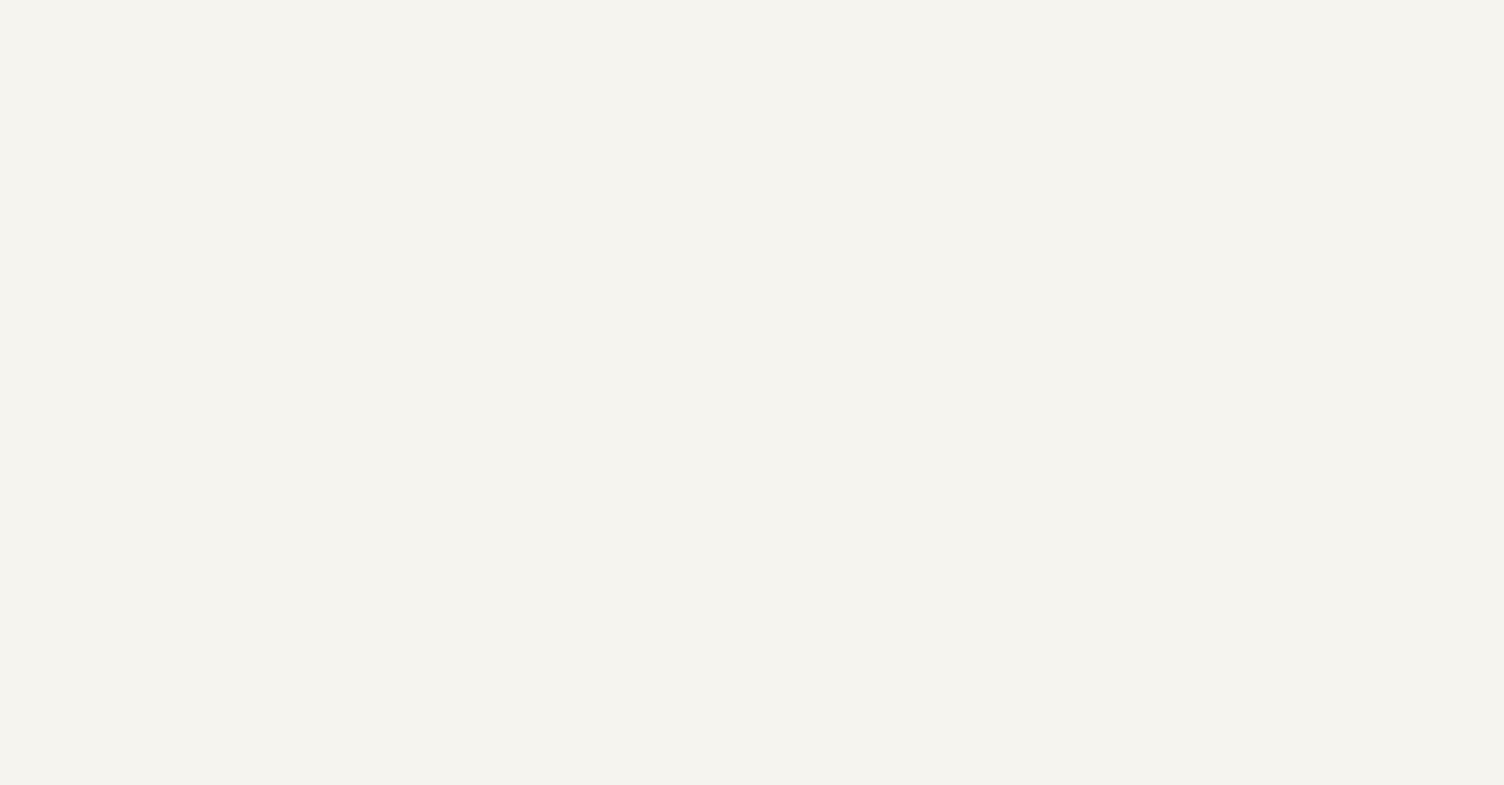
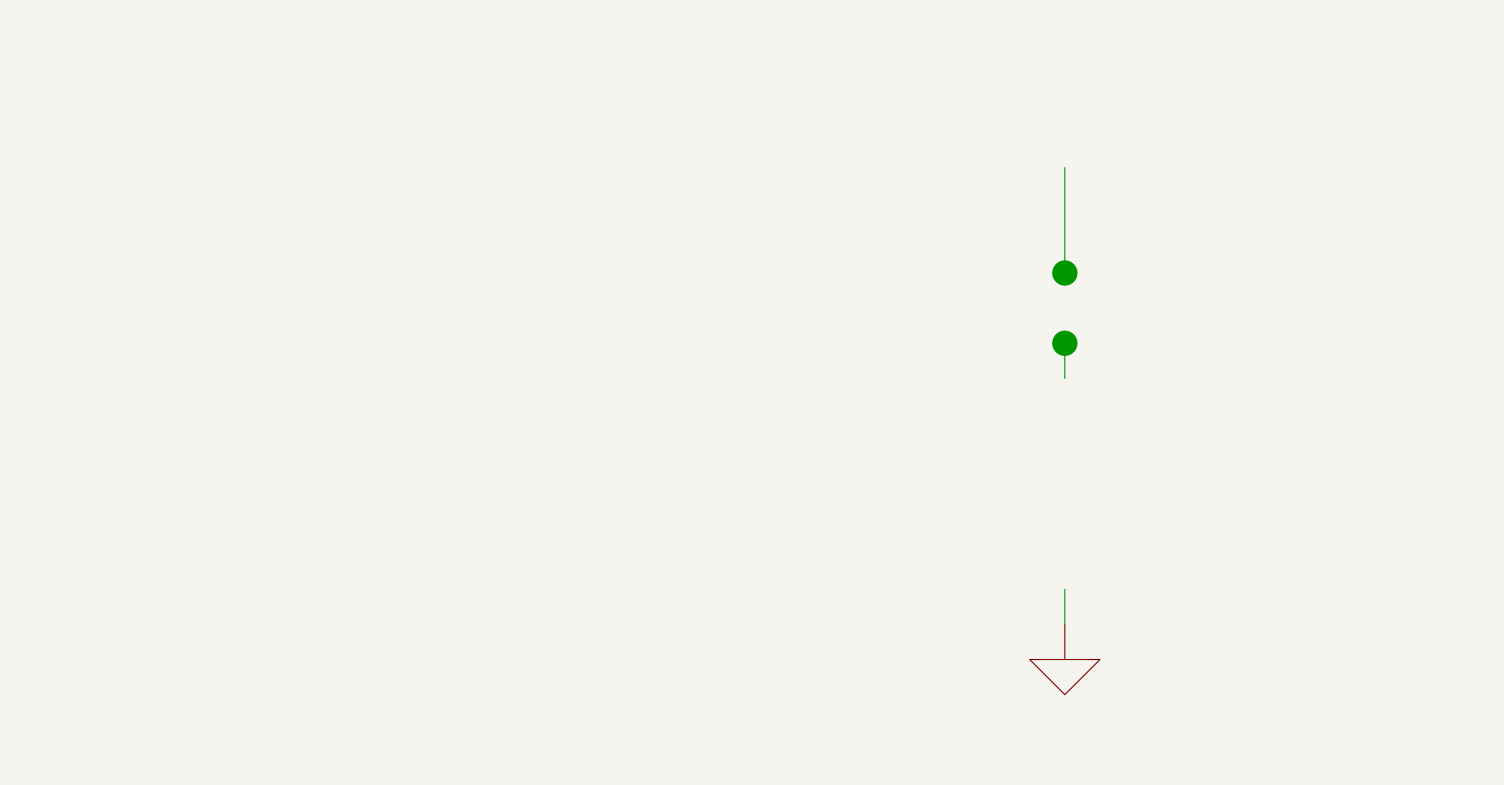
wire: none -> (1064, 167) (1064, 273)
junction: none -> (1064, 273)
wire: none -> (1064, 343) (1064, 378)
junction: none -> (1064, 343)
wire: none -> (1064, 589) (1064, 624)
power symbol: none -> (1064, 659)

